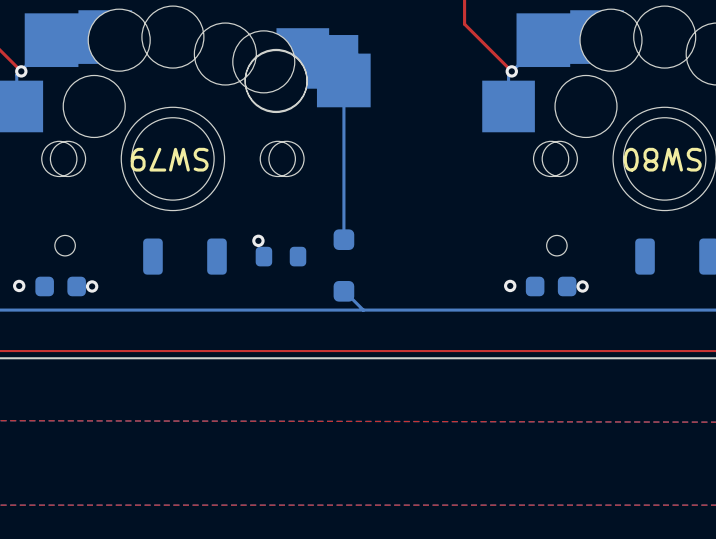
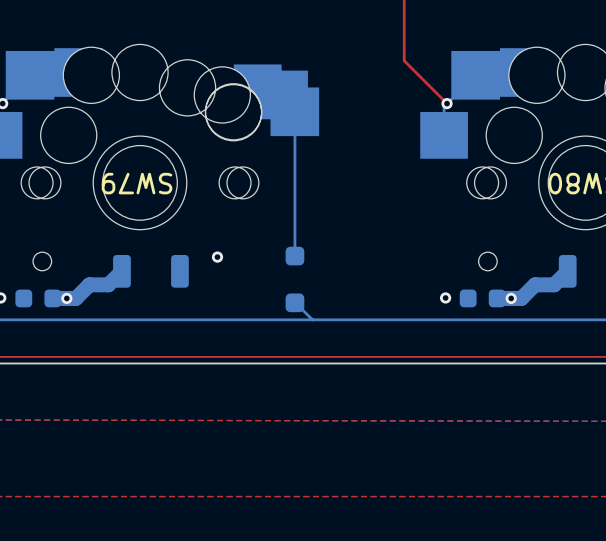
bottom track: none -> (120, 271) (108, 284) (89, 284) (75, 298) (52, 298)
part: (280, 256) -> none
bottom track: none -> (566, 271) (554, 284) (535, 284) (521, 298) (497, 298)

